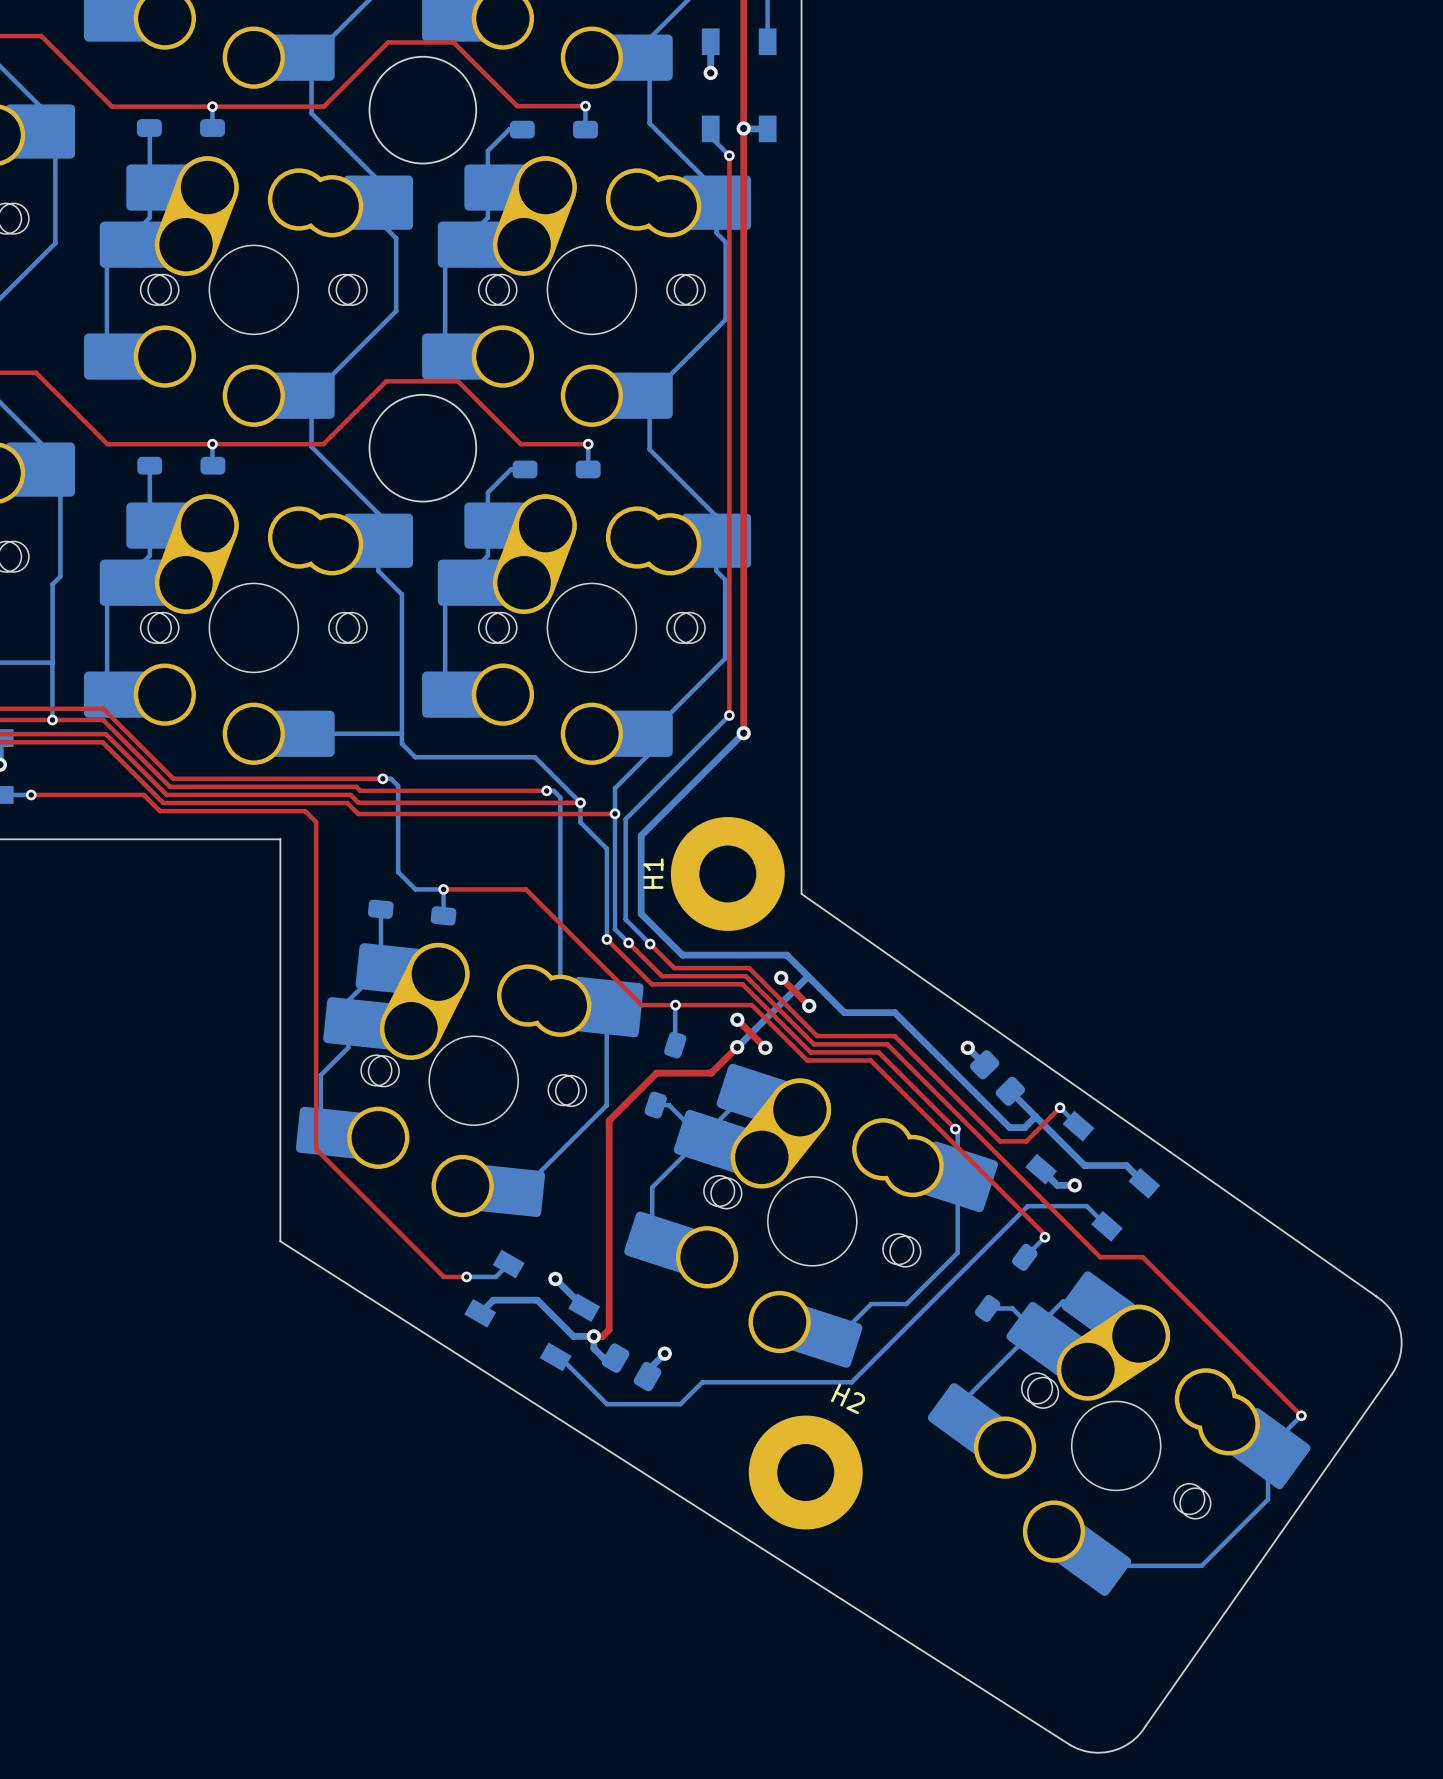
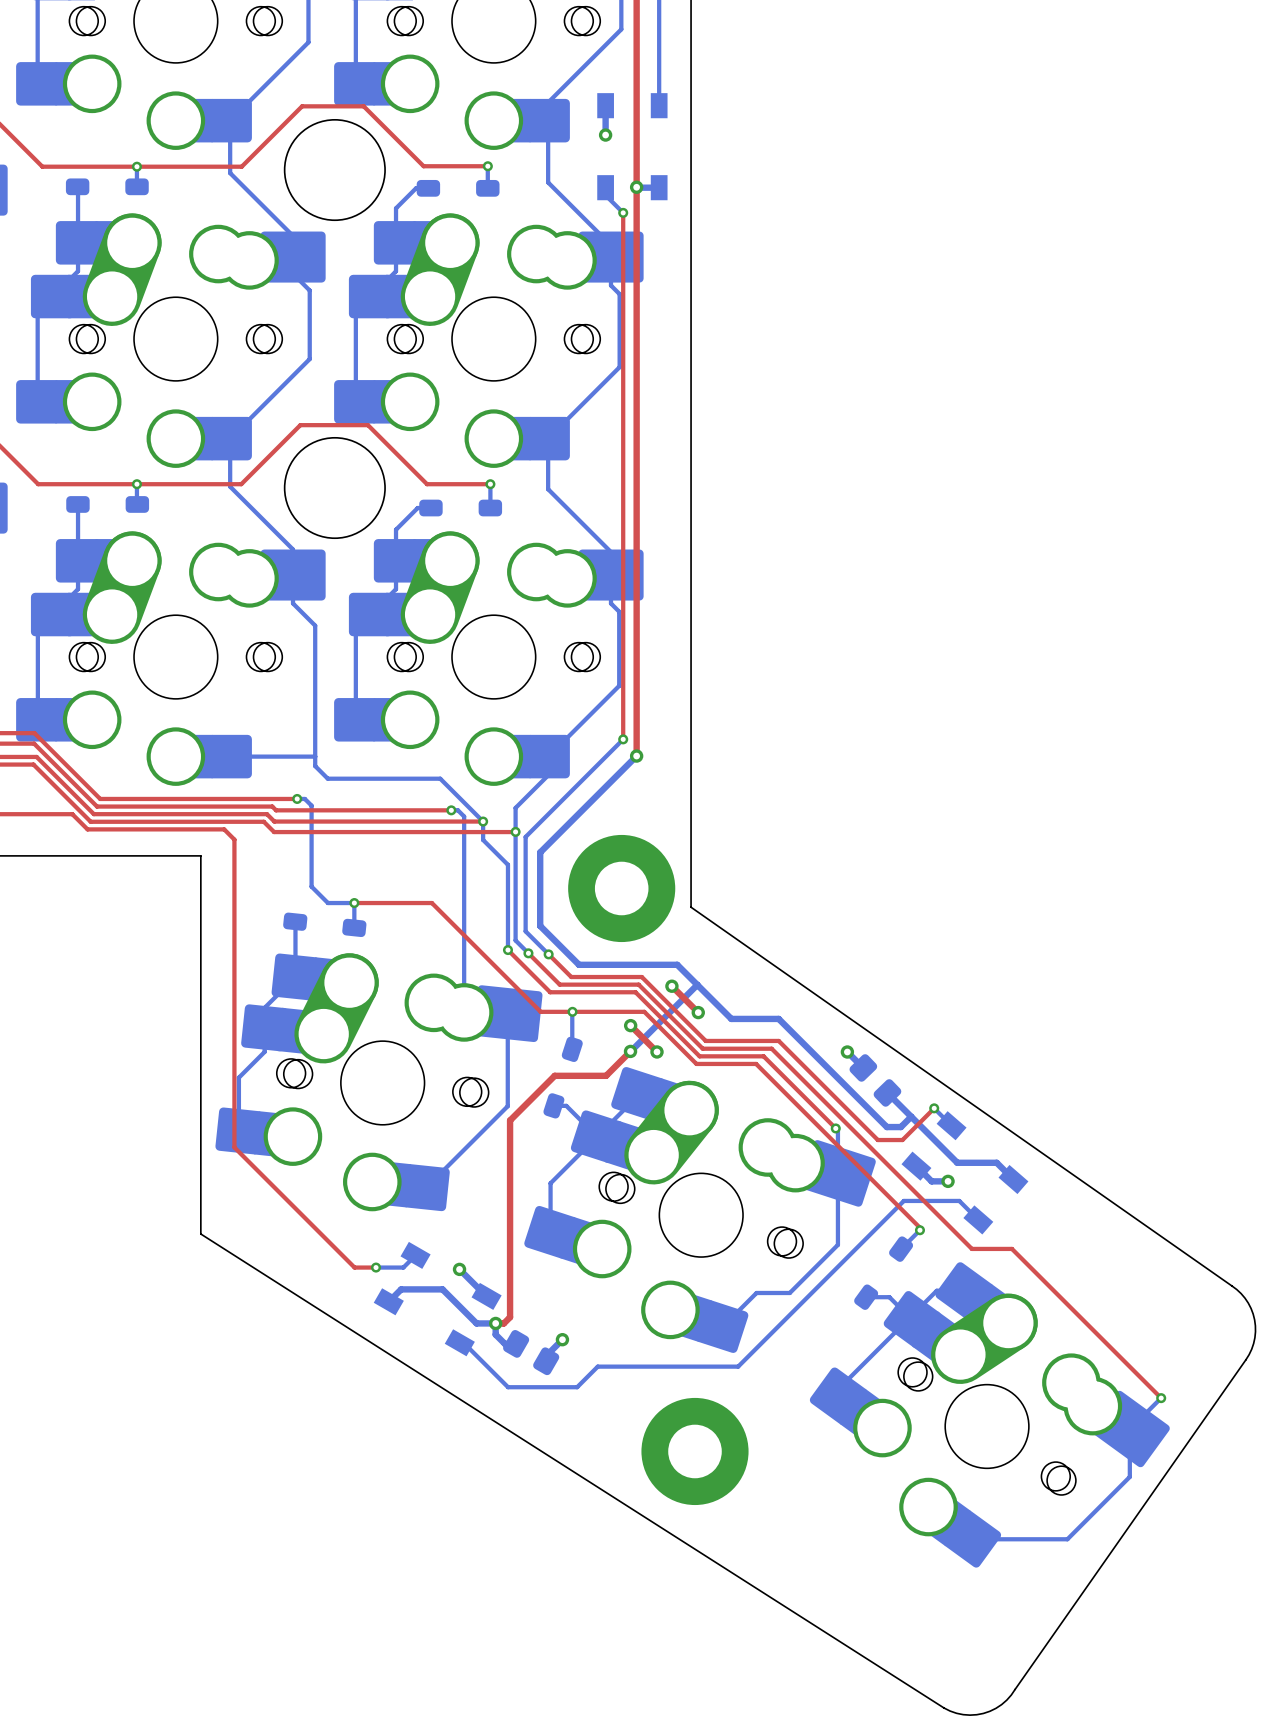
H1 name: H1 (653, 873) -> none
H2 name: H2 (848, 1398) -> none

